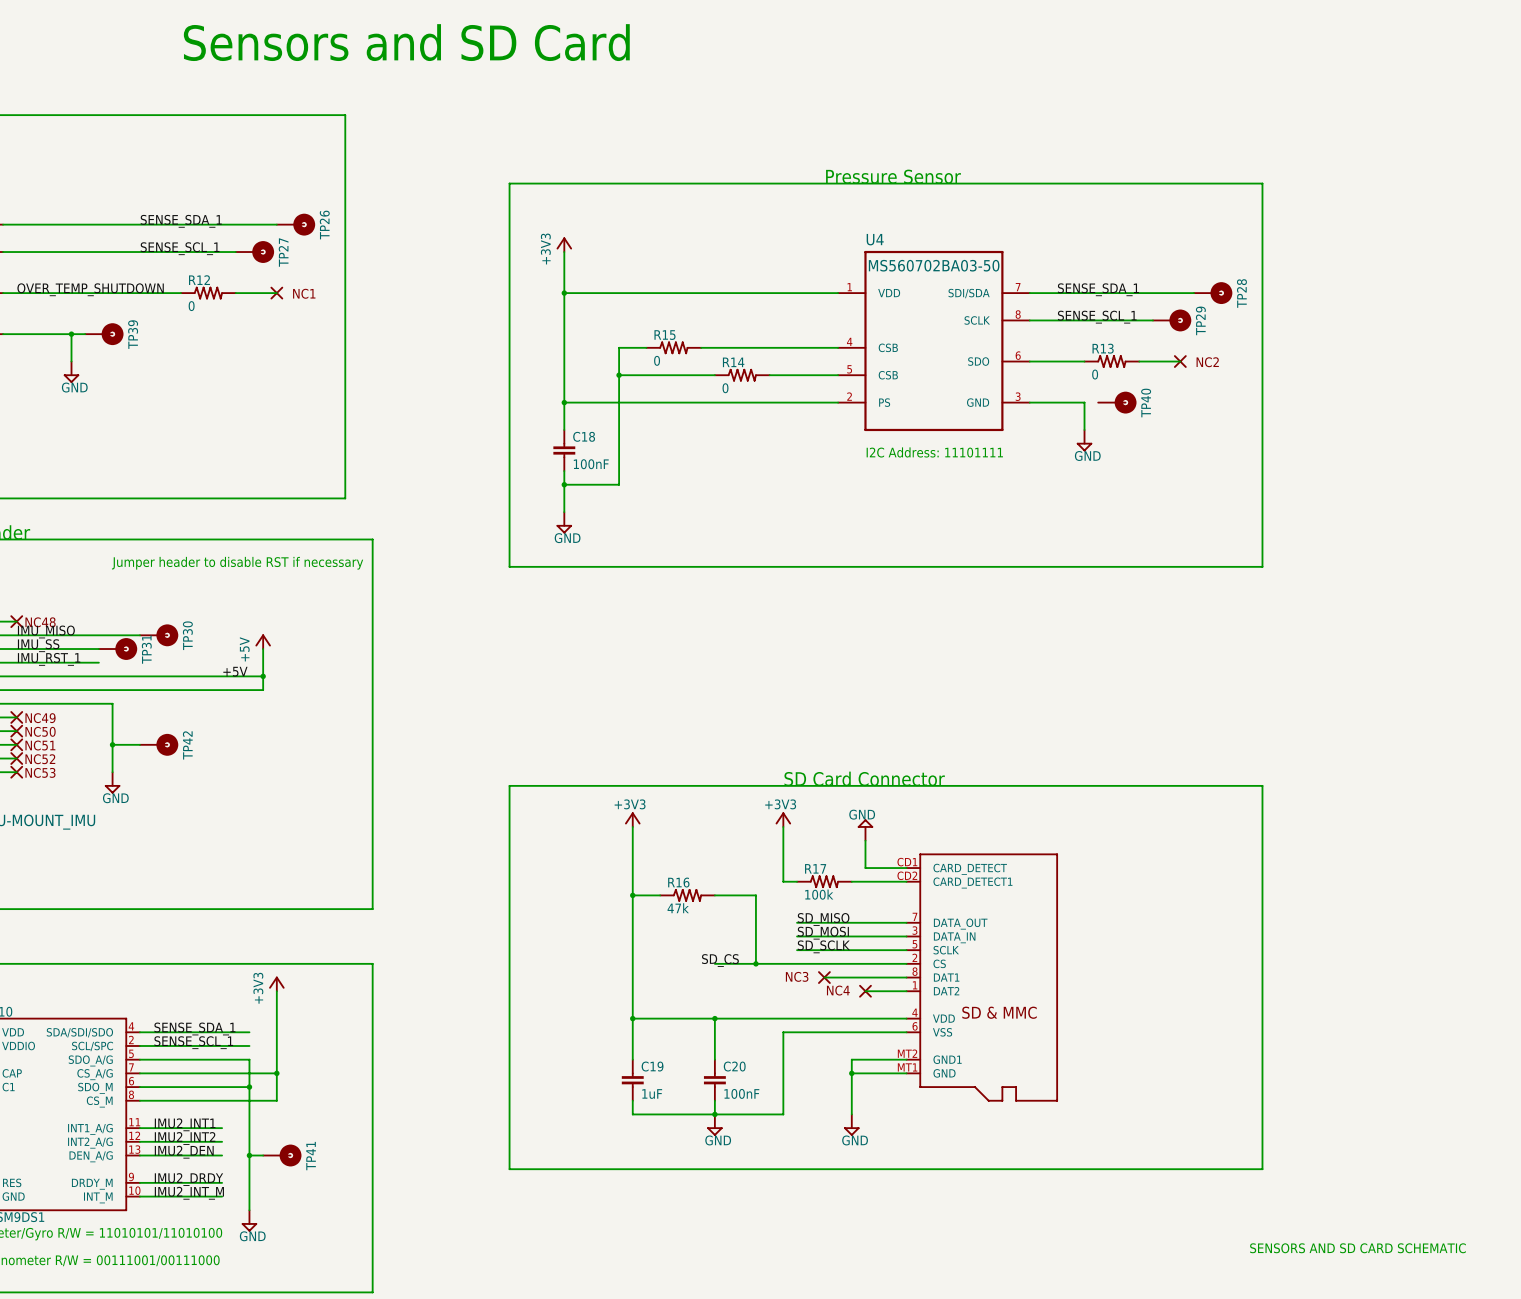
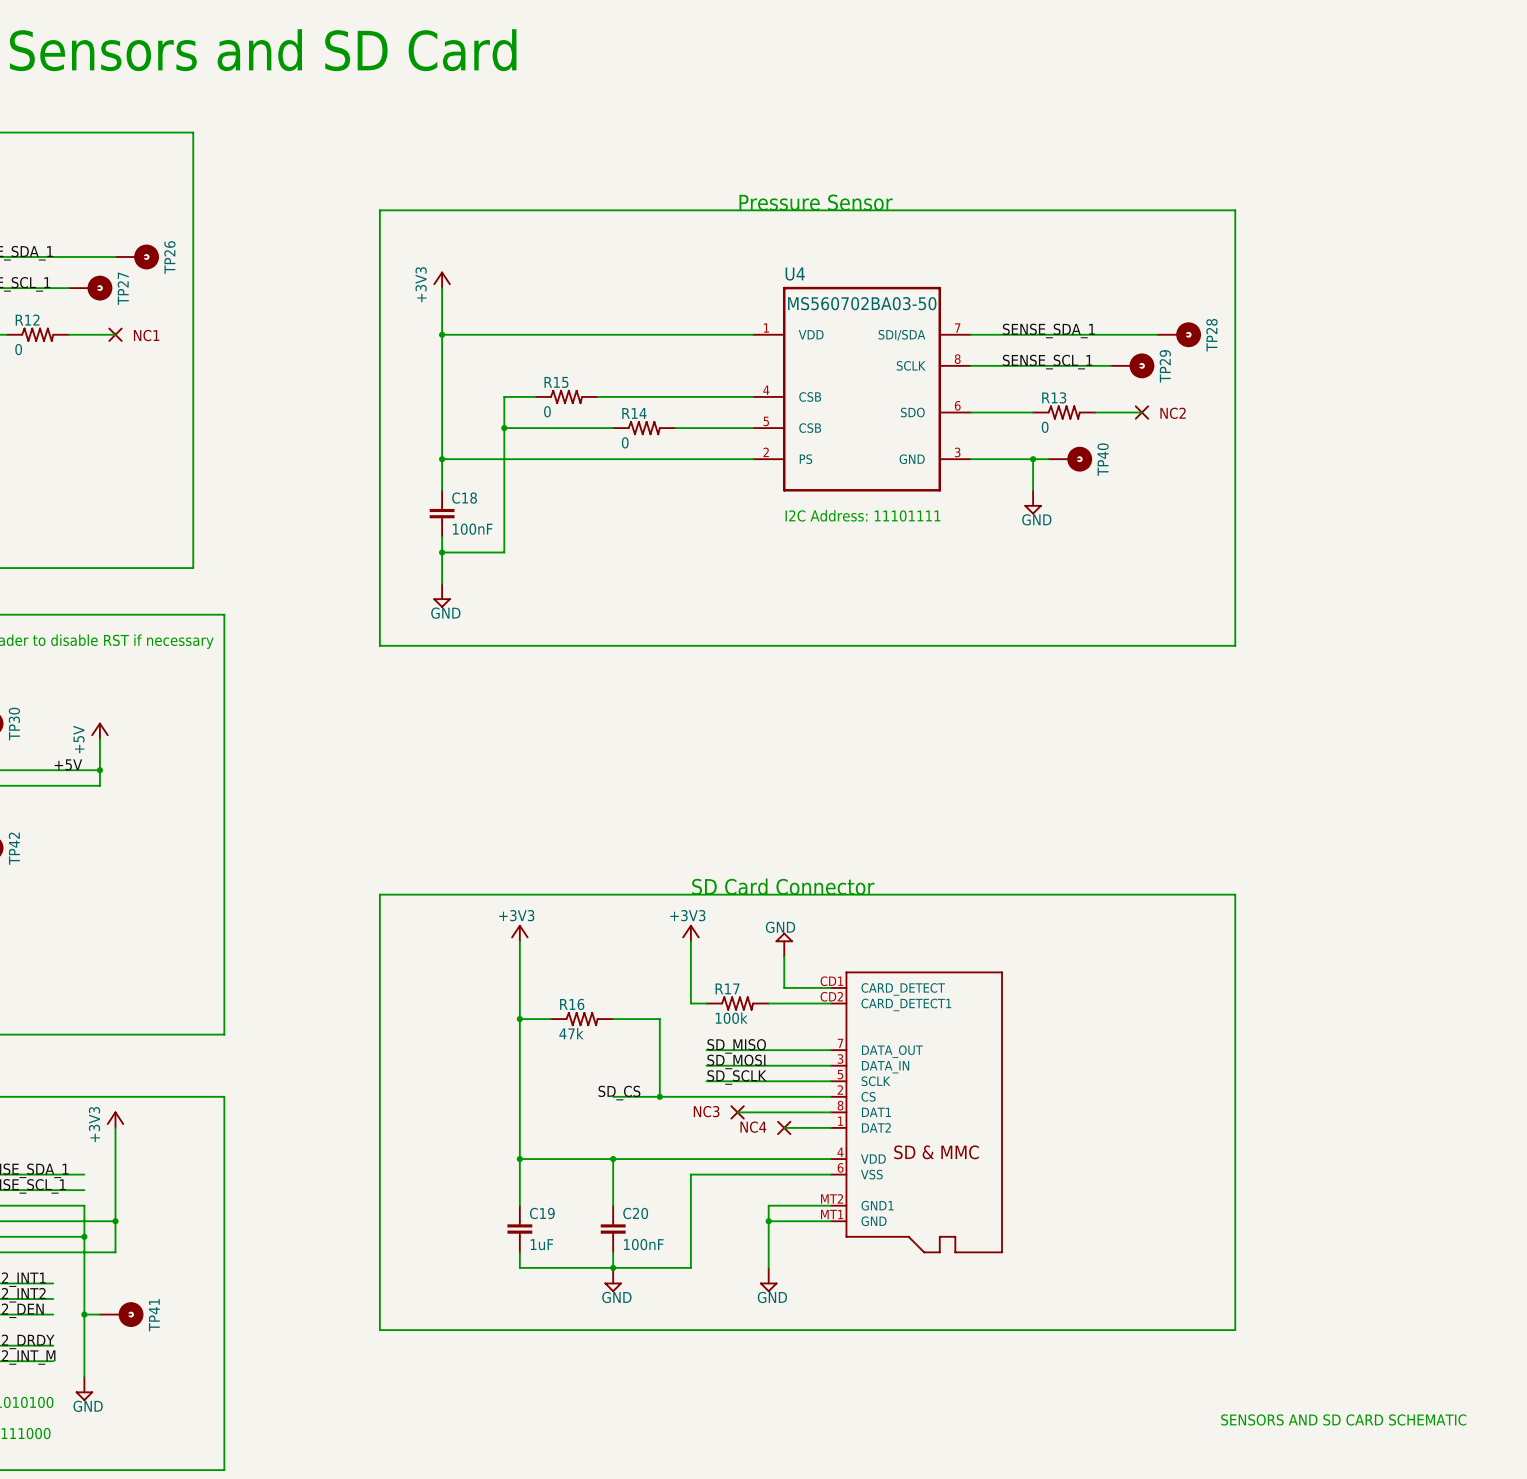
wire: none -> (1033, 459) (1048, 459)
junction: none -> (1033, 459)

